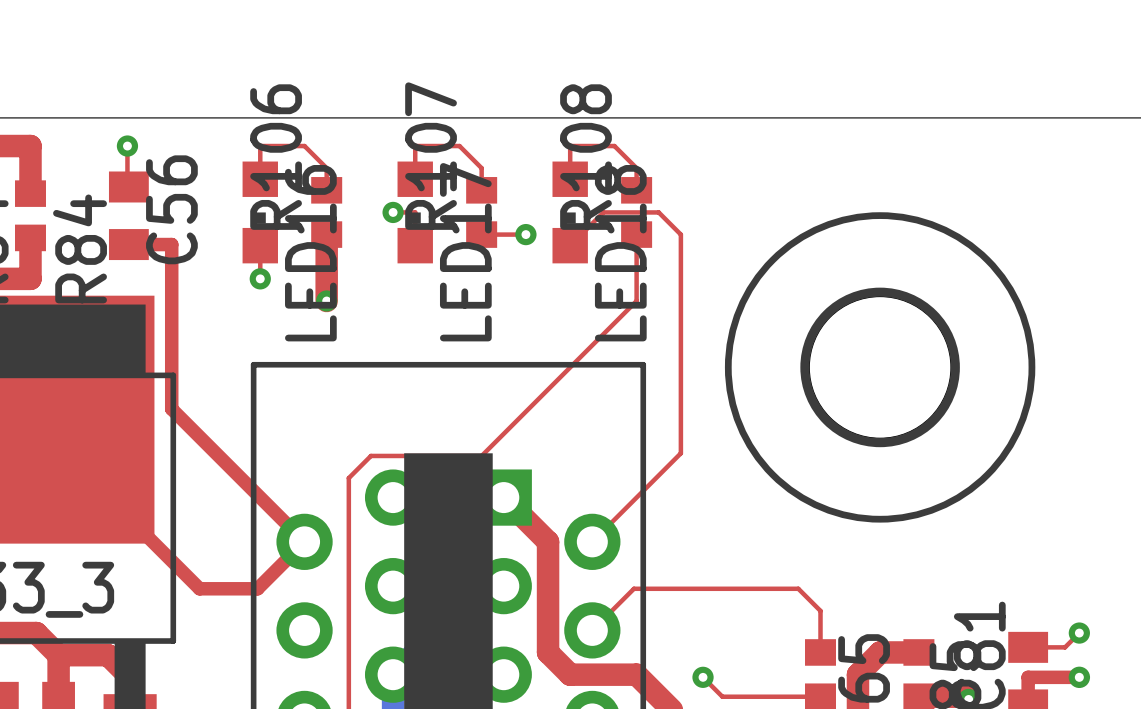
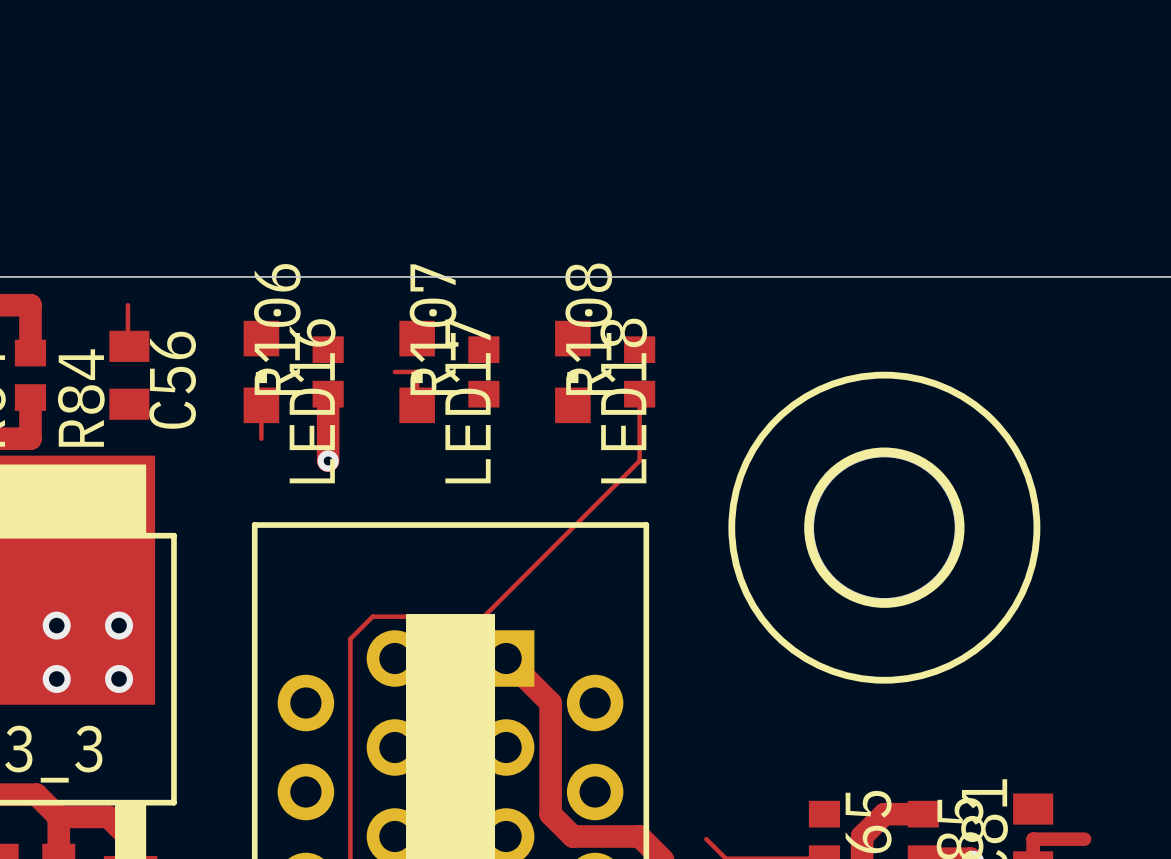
via: (127, 146) -> none
top track: (260, 179) (260, 146) (304, 146) (326, 168) (326, 190) -> none
top track: (415, 179) (415, 146) (459, 146) (481, 168) (481, 190) -> none
top track: (570, 179) (570, 146) (614, 146) (636, 168) (636, 190) -> none
via: (393, 212) -> none
top track: (481, 234) (525, 234) -> none
via: (525, 234) -> none
top track: (128, 244) (171, 244) (171, 409) (304, 541) (257, 588) (199, 588) (30, 419) -> none
top track: (570, 245) (603, 212) (658, 212) (680, 234) (680, 453) (592, 541) -> none
via: (260, 278) -> none
via: none -> (56, 625)
via: none -> (119, 625)
via: none -> (56, 678)
via: none -> (119, 678)
top track: (592, 630) (633, 588) (798, 588) (820, 610) (820, 652) -> none
top track: (1079, 633) (1065, 647) (1028, 647) -> none
via: (1079, 633) -> none
via: (703, 677) -> none
via: (1079, 677) -> none

